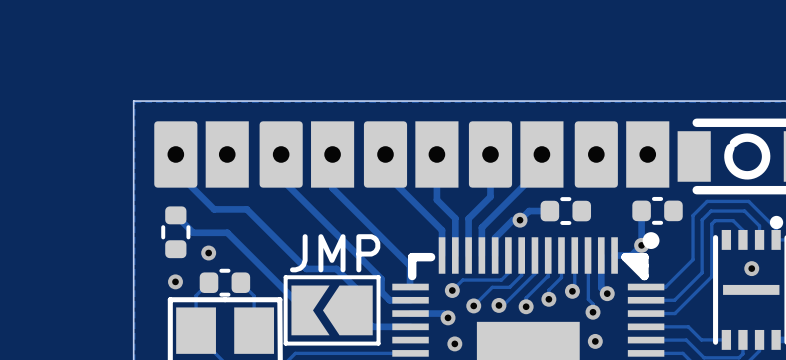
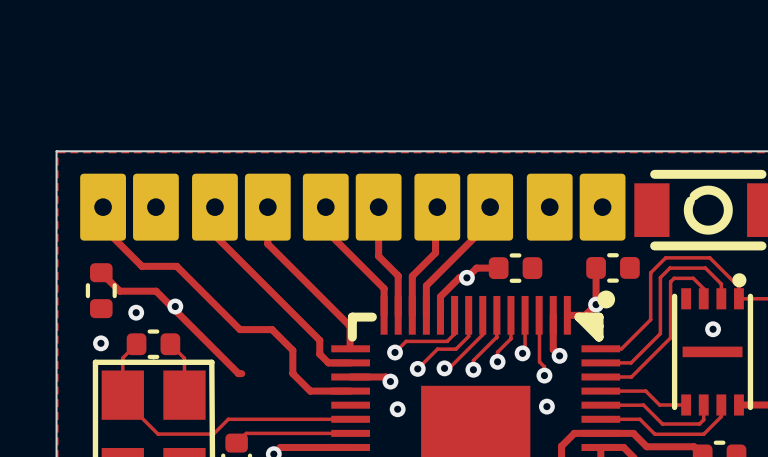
part footprint: [154, 121, 249, 188] -> [80, 173, 179, 241]
part footprint: [259, 121, 355, 188] -> [192, 173, 291, 241]
part footprint: [363, 121, 459, 188] -> [302, 173, 402, 241]
part footprint: [468, 121, 564, 188] -> [414, 173, 514, 241]
part footprint: [574, 121, 670, 188] -> [526, 173, 626, 241]
via: none -> (175, 306)
text: JMP (335, 253) -> none
part: (332, 310) -> none

